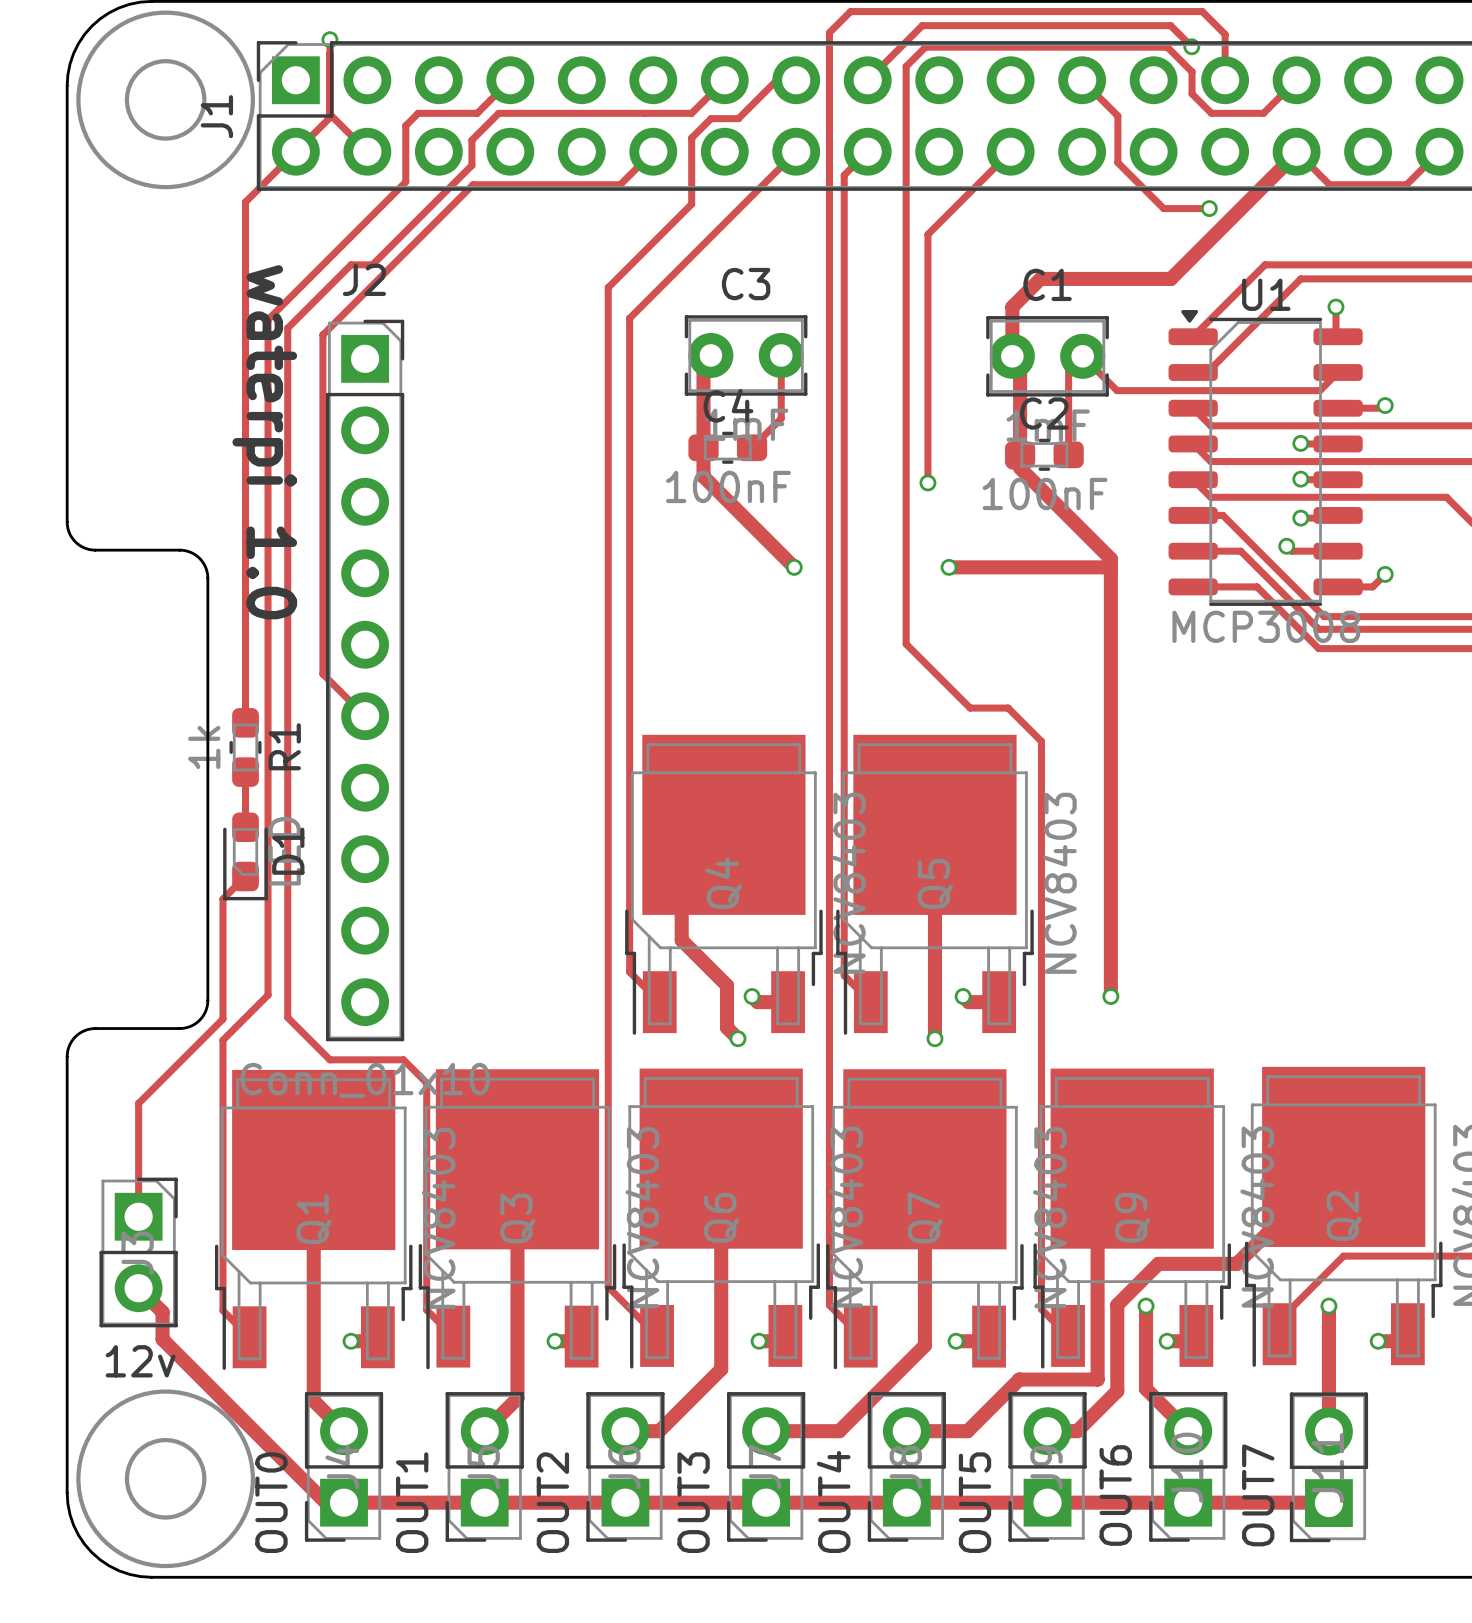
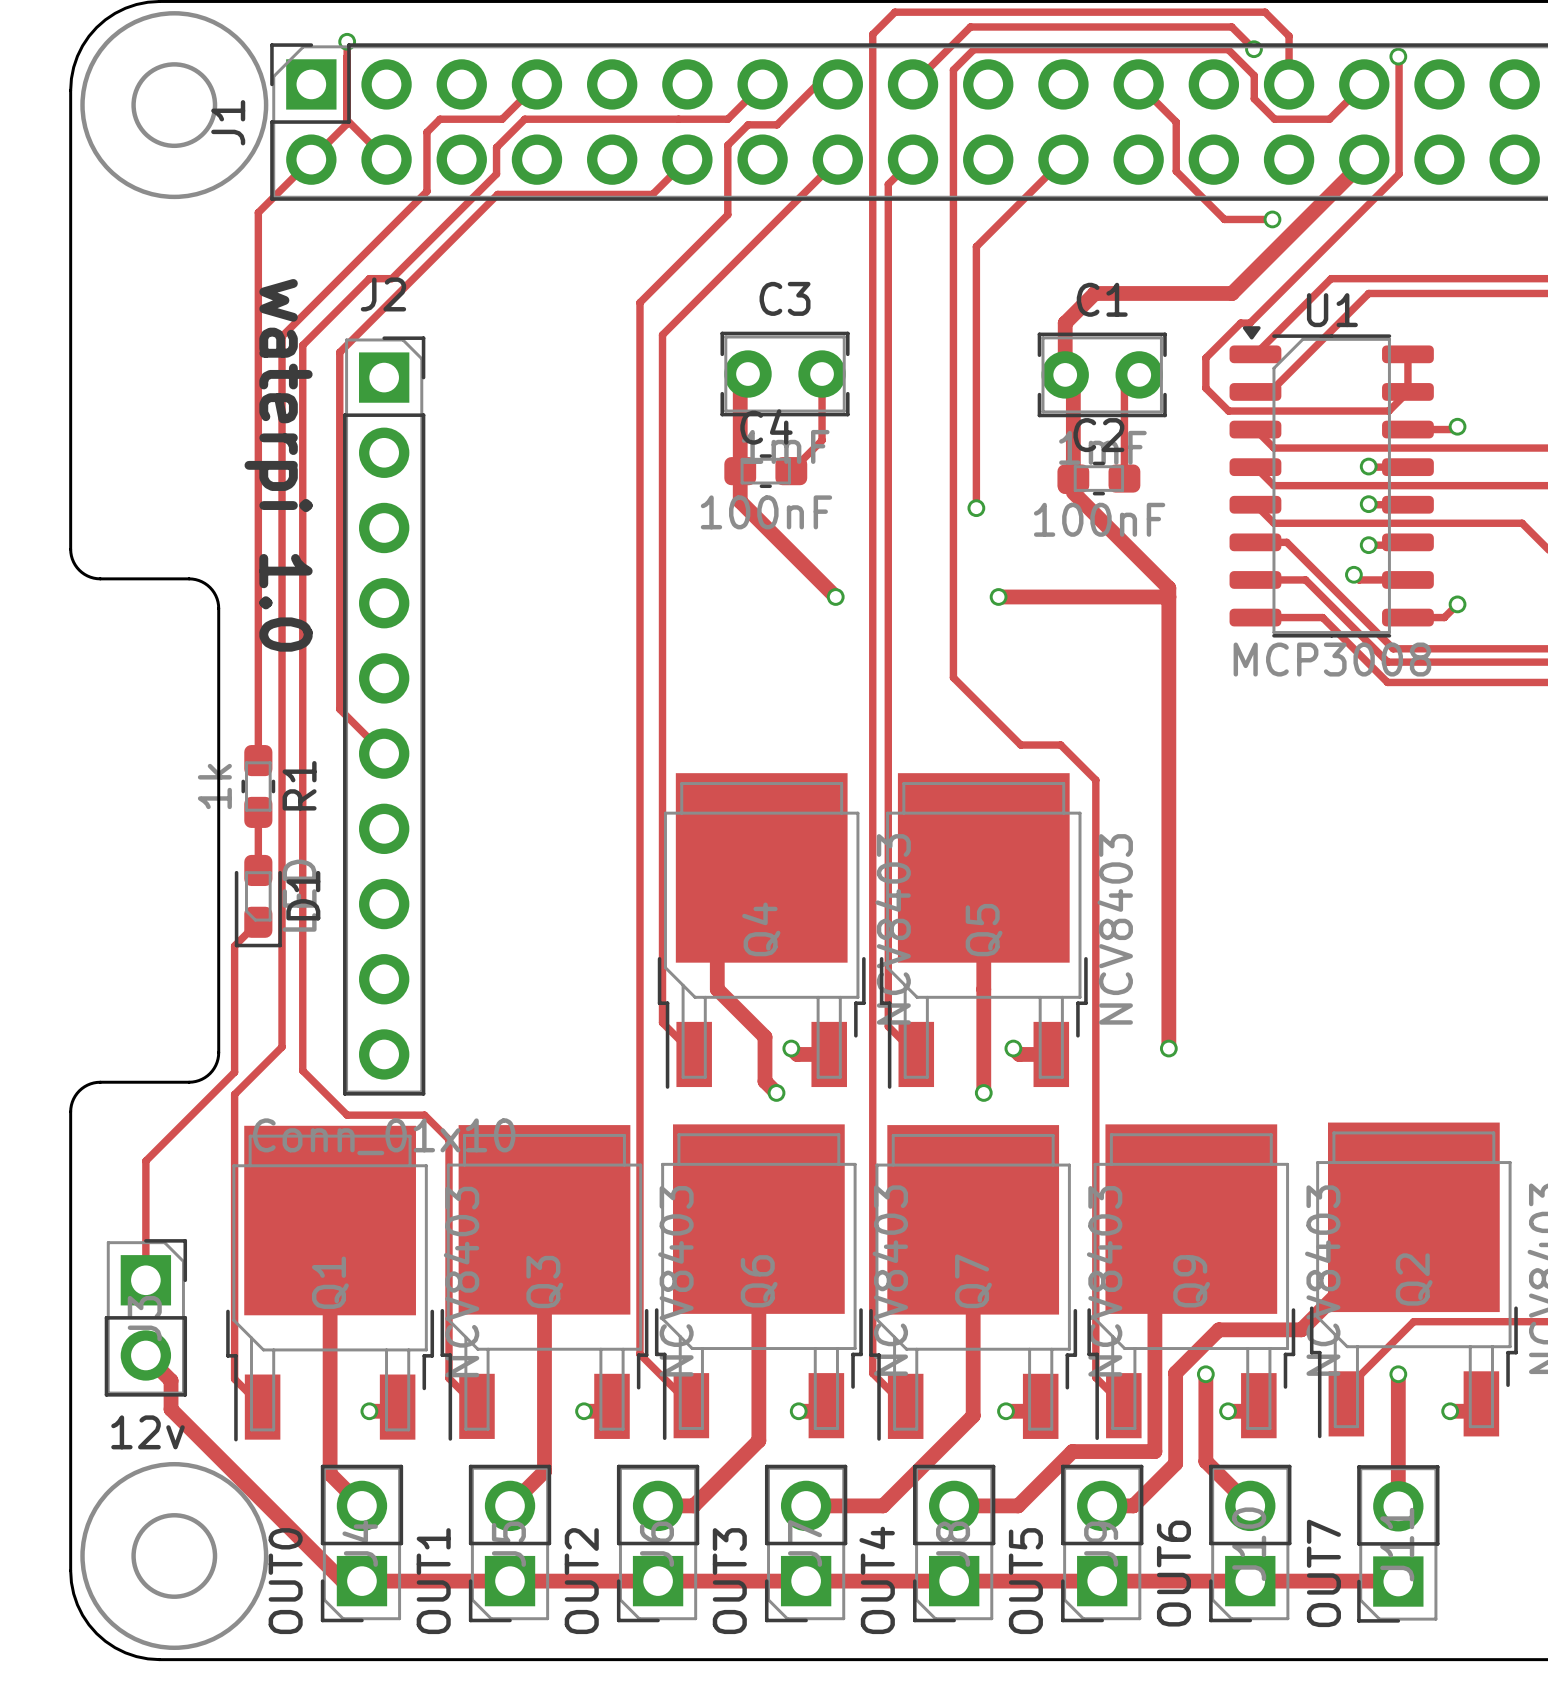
via: none -> (1398, 56)
track: (1296, 151) (1329, 184) (1406, 184) (1439, 151) -> none
track: (1335, 307) (1335, 334) (1338, 336) -> (1407, 391) (1407, 354)
via: (1335, 307) -> none
track: (1082, 356) (1117, 390) (1167, 390) -> (1398, 56) (1399, 174) (1250, 323) (1240, 323) (1205, 358) (1205, 388) (1228, 411)

